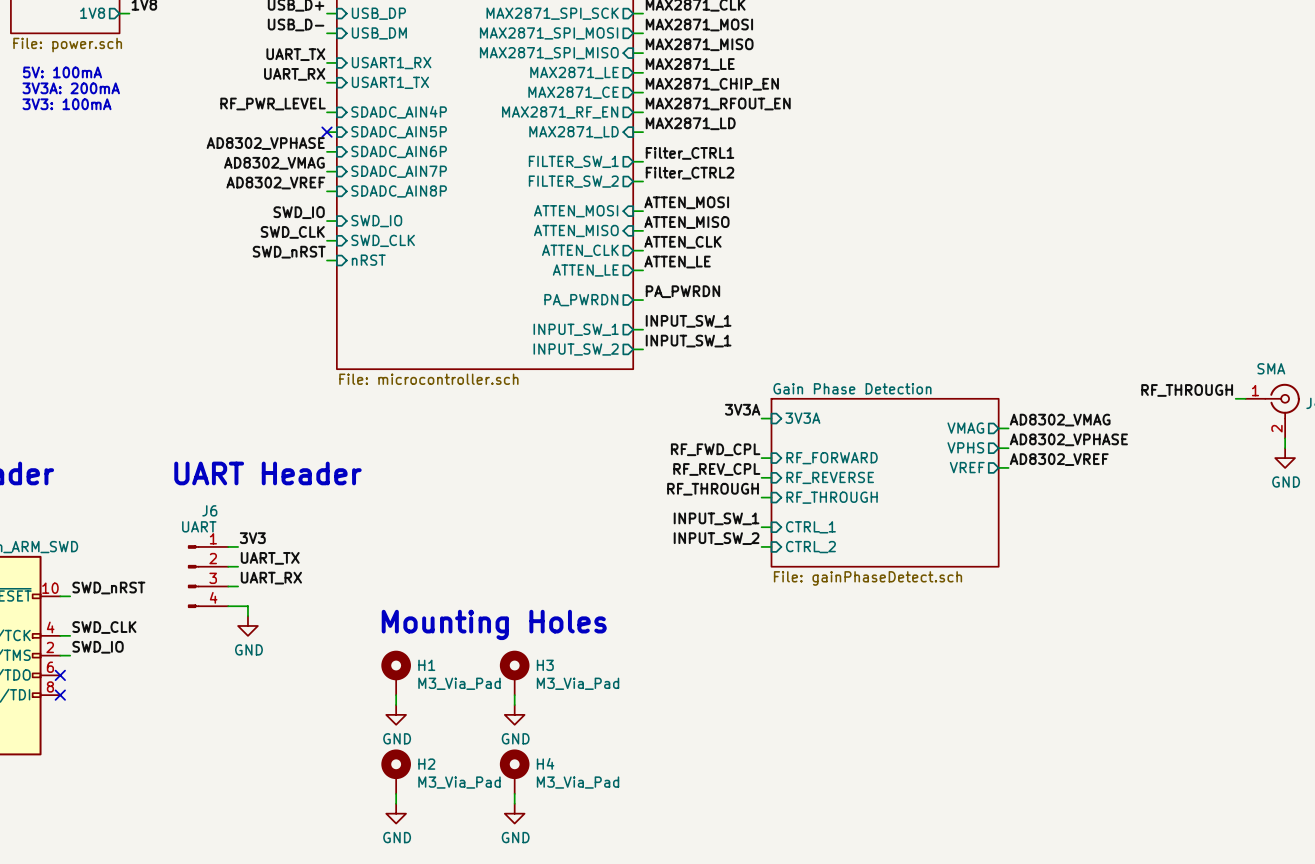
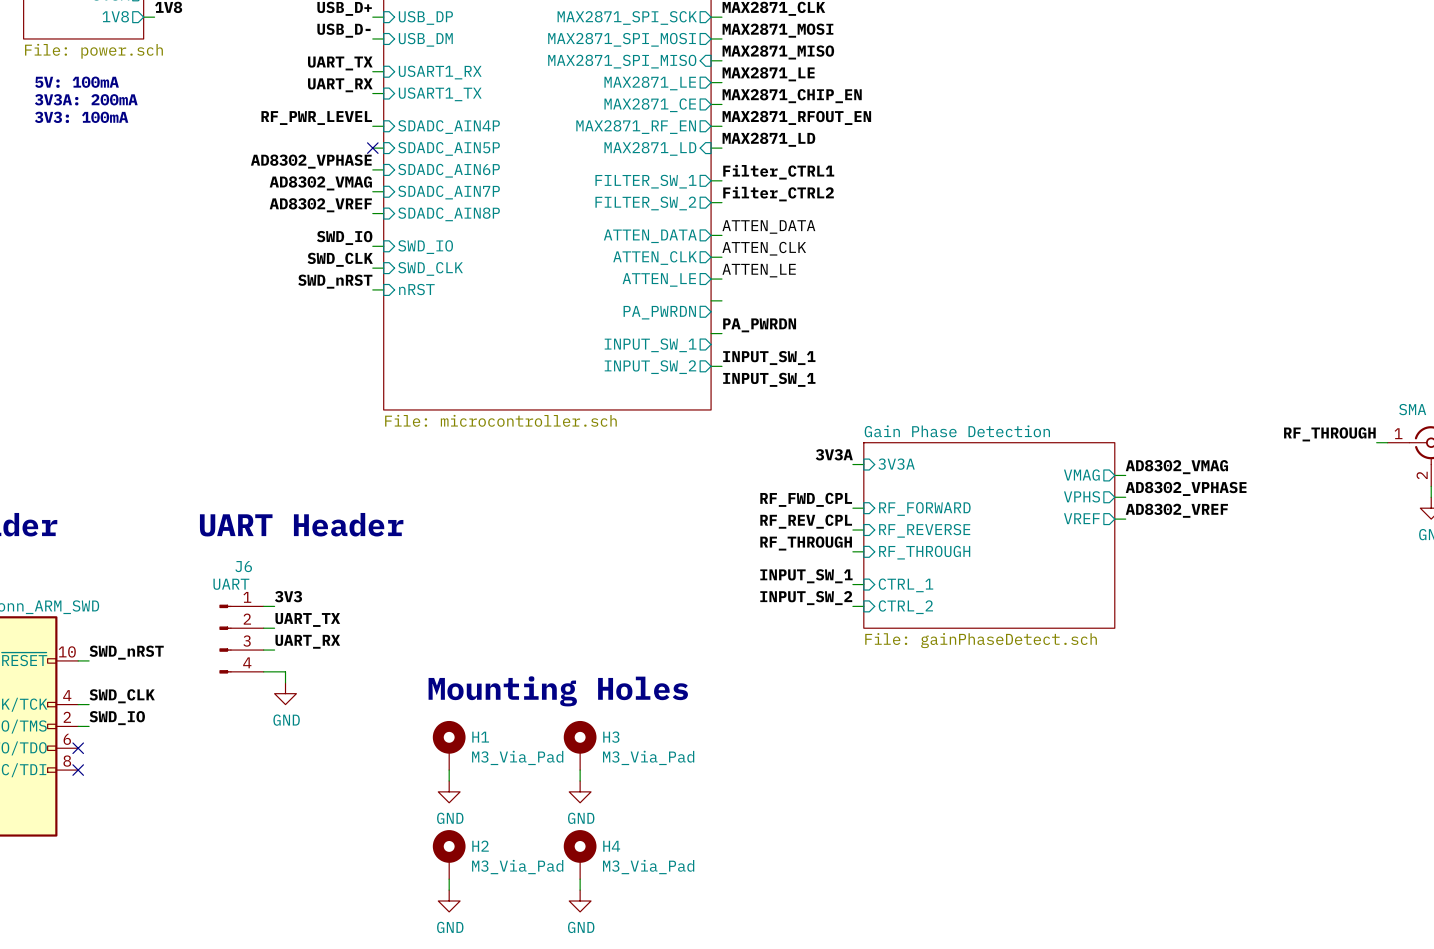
label: ATTEN_MOSI (686, 202) -> ATTEN_DATA (768, 226)
sheet pin shape: input (576, 211) -> output (650, 236)
sheet pin: ATTEN_MOSI (576, 211) -> ATTEN_DATA (650, 236)
label: ATTEN_MISO (686, 222) -> ATTEN_CLK (764, 248)
sheet pin shape: input (576, 230) -> output (655, 258)
sheet pin: ATTEN_MISO (576, 230) -> ATTEN_CLK (655, 258)
label: ATTEN_CLK (682, 242) -> ATTEN_LE (759, 270)
sheet pin: ATTEN_CLK (580, 250) -> ATTEN_LE (659, 279)
label: ATTEN_LE (677, 262) -> none
sheet pin: ATTEN_LE (585, 270) -> none
sheet pin position: PA_PWRDN (581, 300) -> PA_PWRDN (659, 312)
sheet pin: none -> INPUT_SW_1 (650, 345)
sheet pin: INPUT_SW_1 (576, 329) -> INPUT_SW_2 (650, 367)
sheet pin: INPUT_SW_2 (576, 349) -> none
wire: (633, 349) (643, 349) -> none

